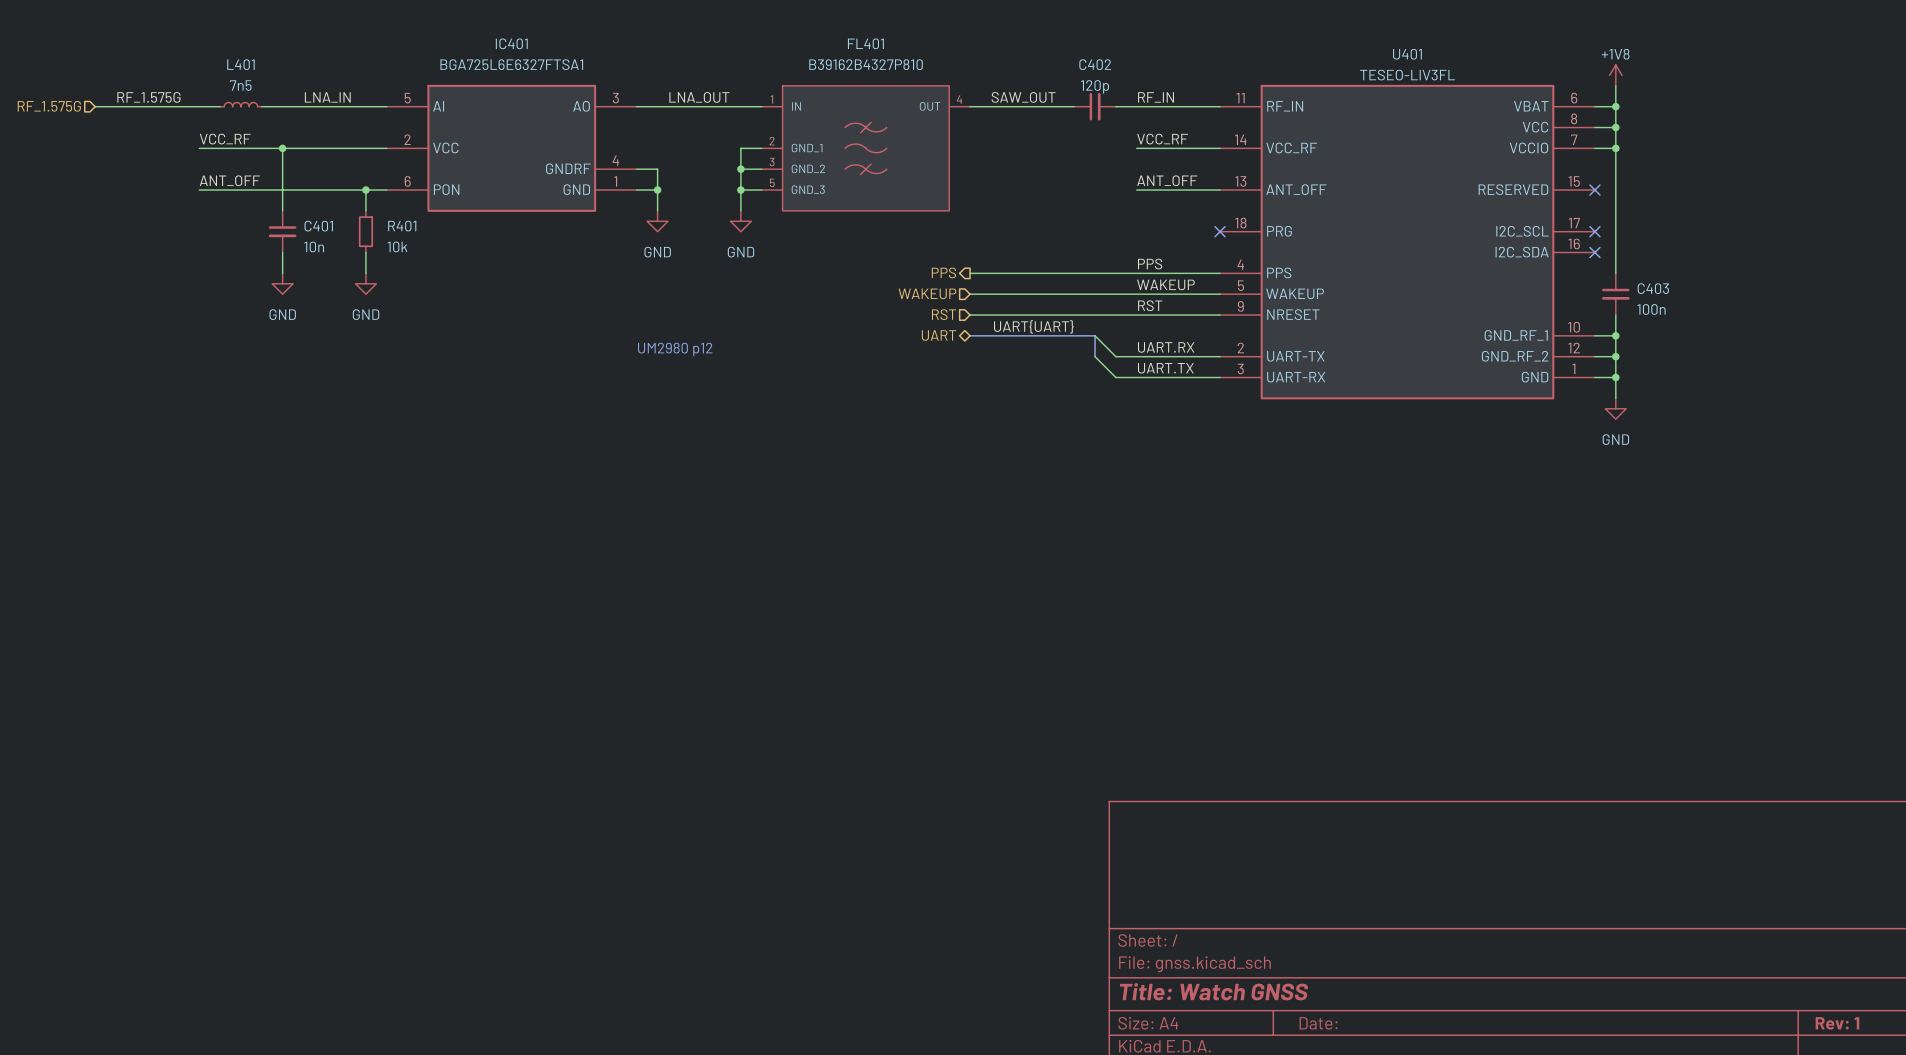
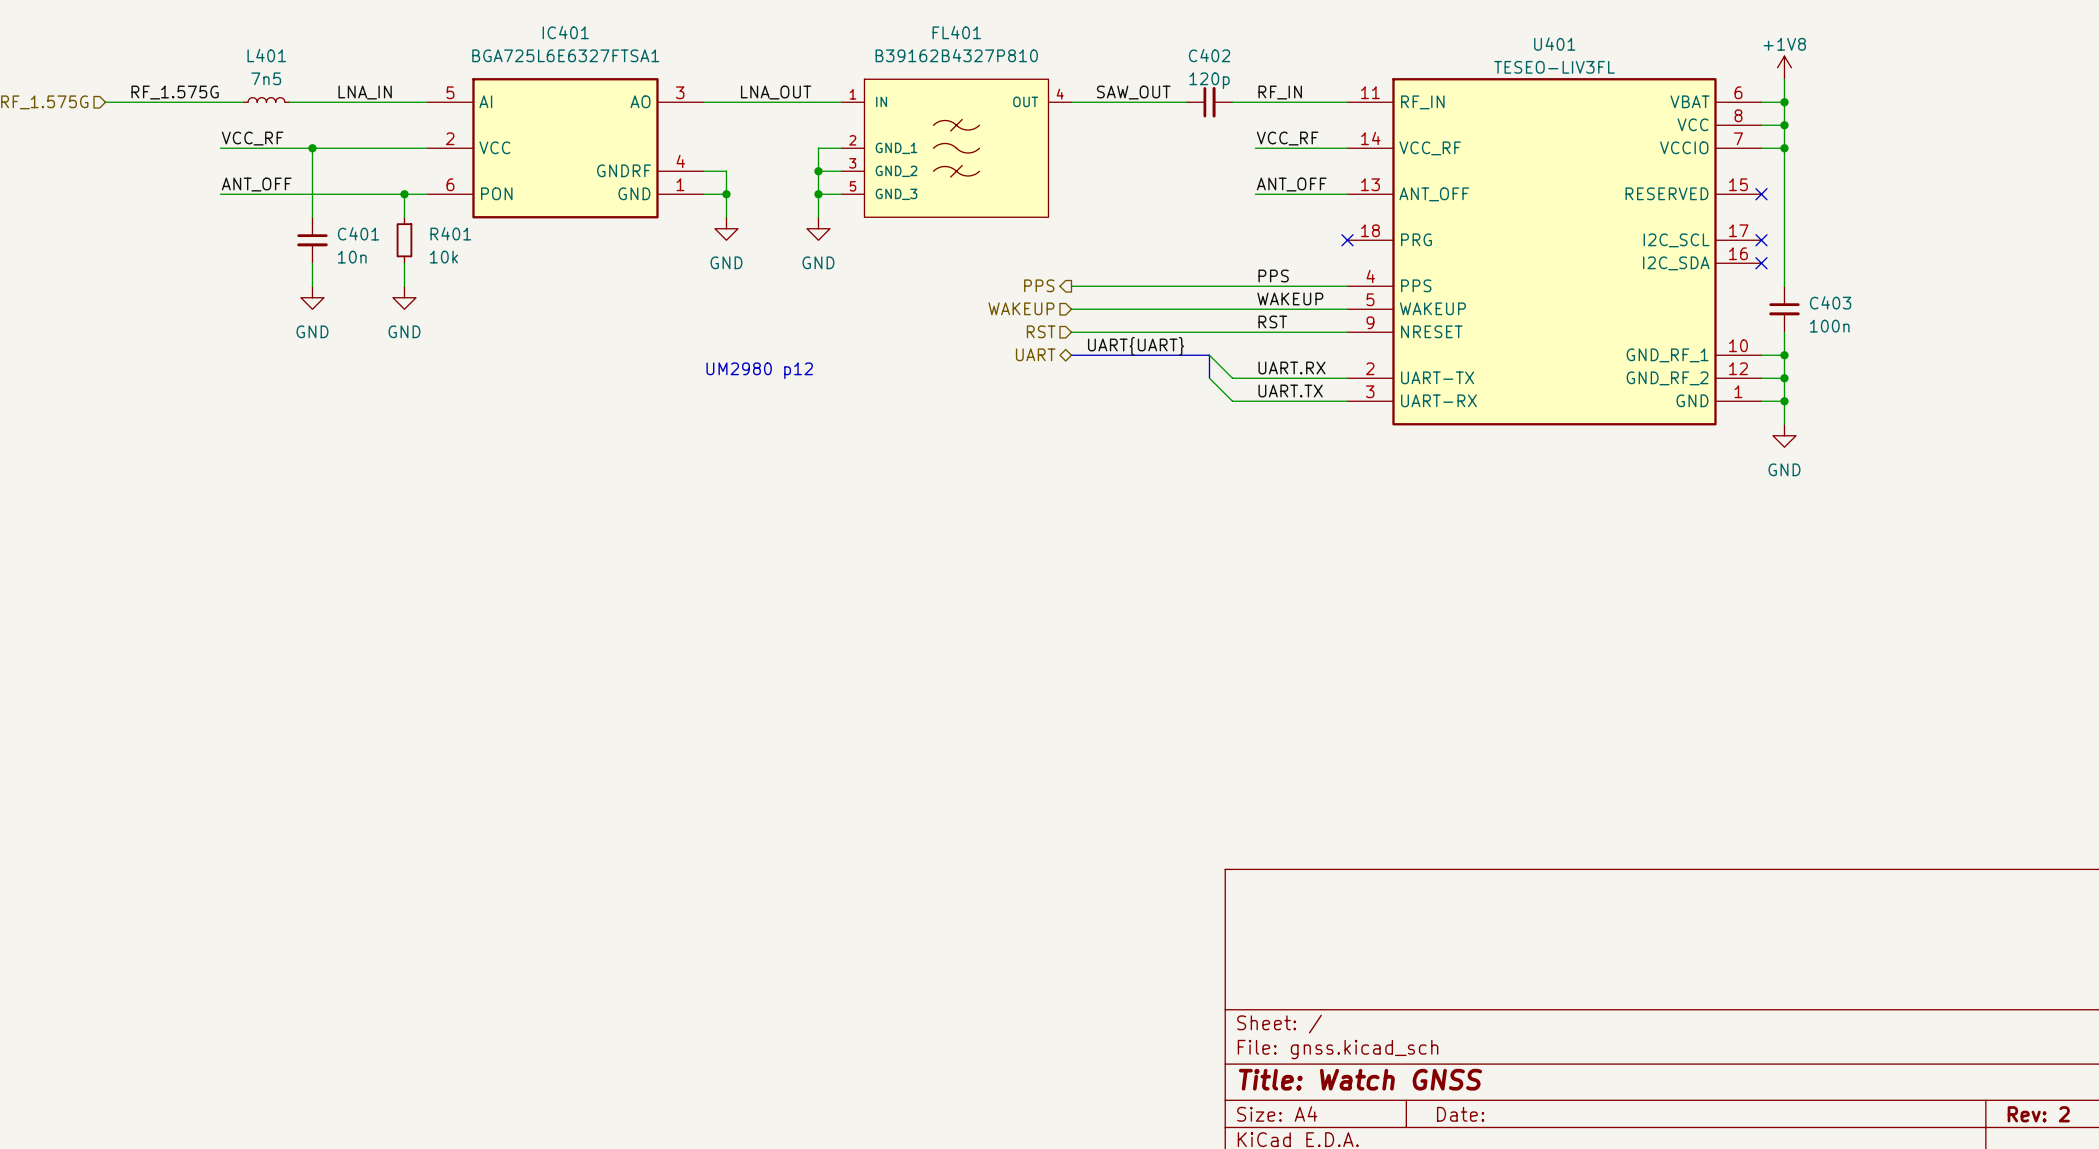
title block: Rev: 1 (1837, 1023) -> Rev: 2 (2038, 1114)

